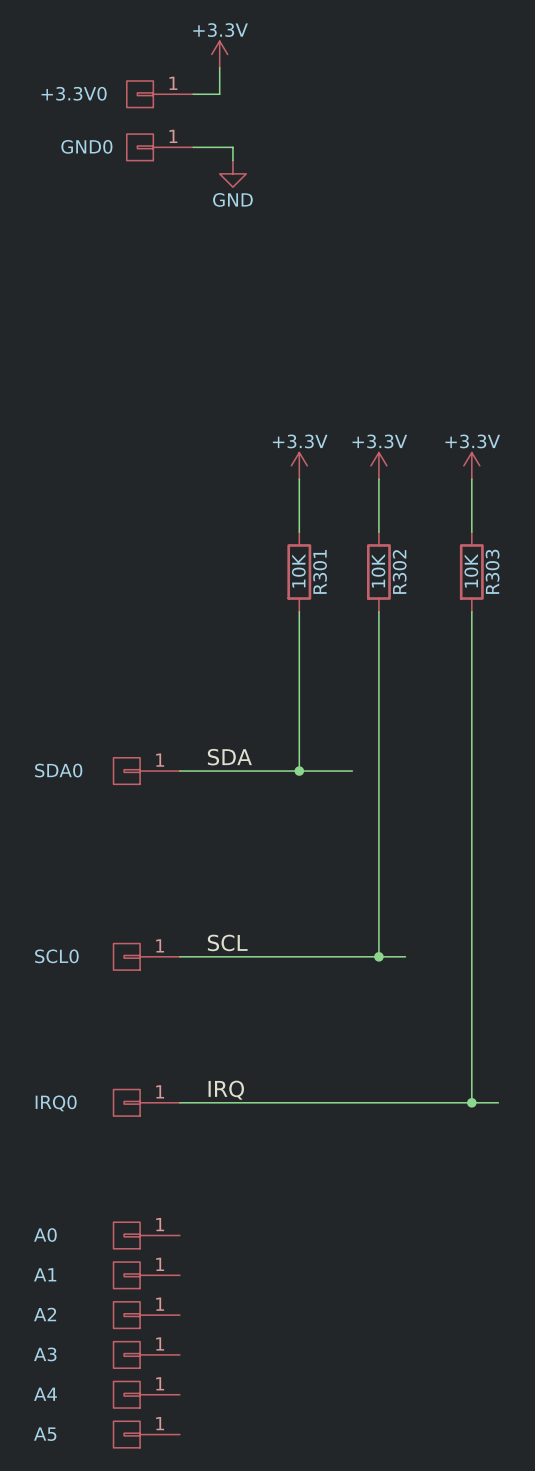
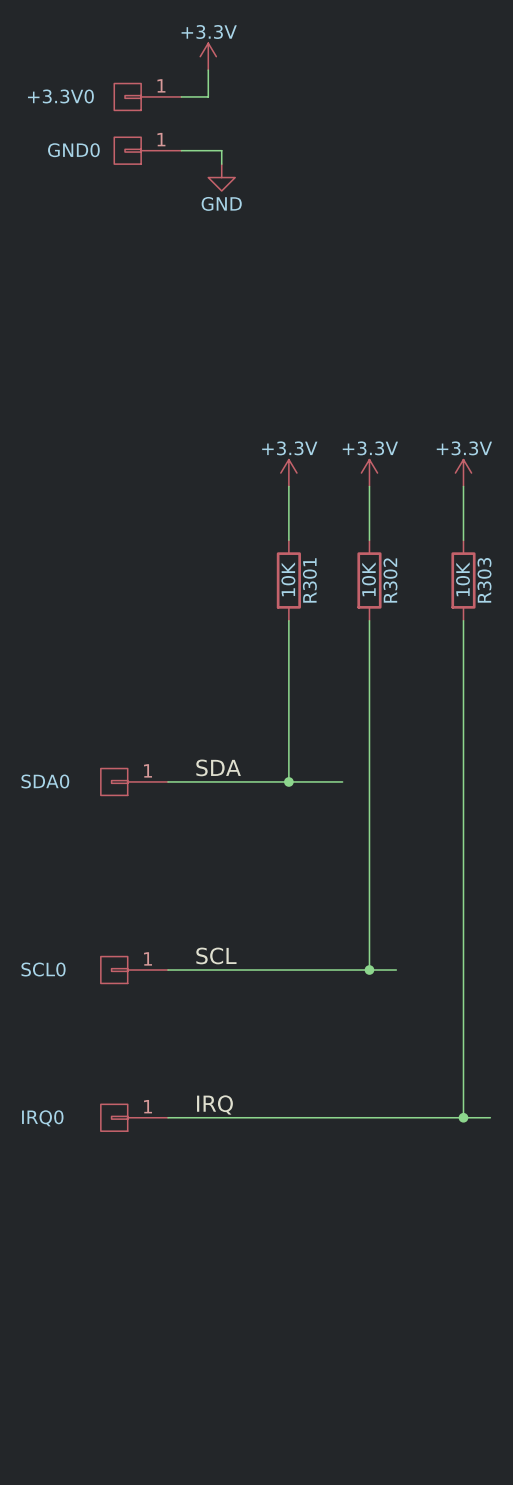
A0: (146, 1235) -> none
A1: (146, 1275) -> none
A2: (146, 1315) -> none
A3: (146, 1354) -> none
A4: (146, 1394) -> none
A5: (146, 1434) -> none

